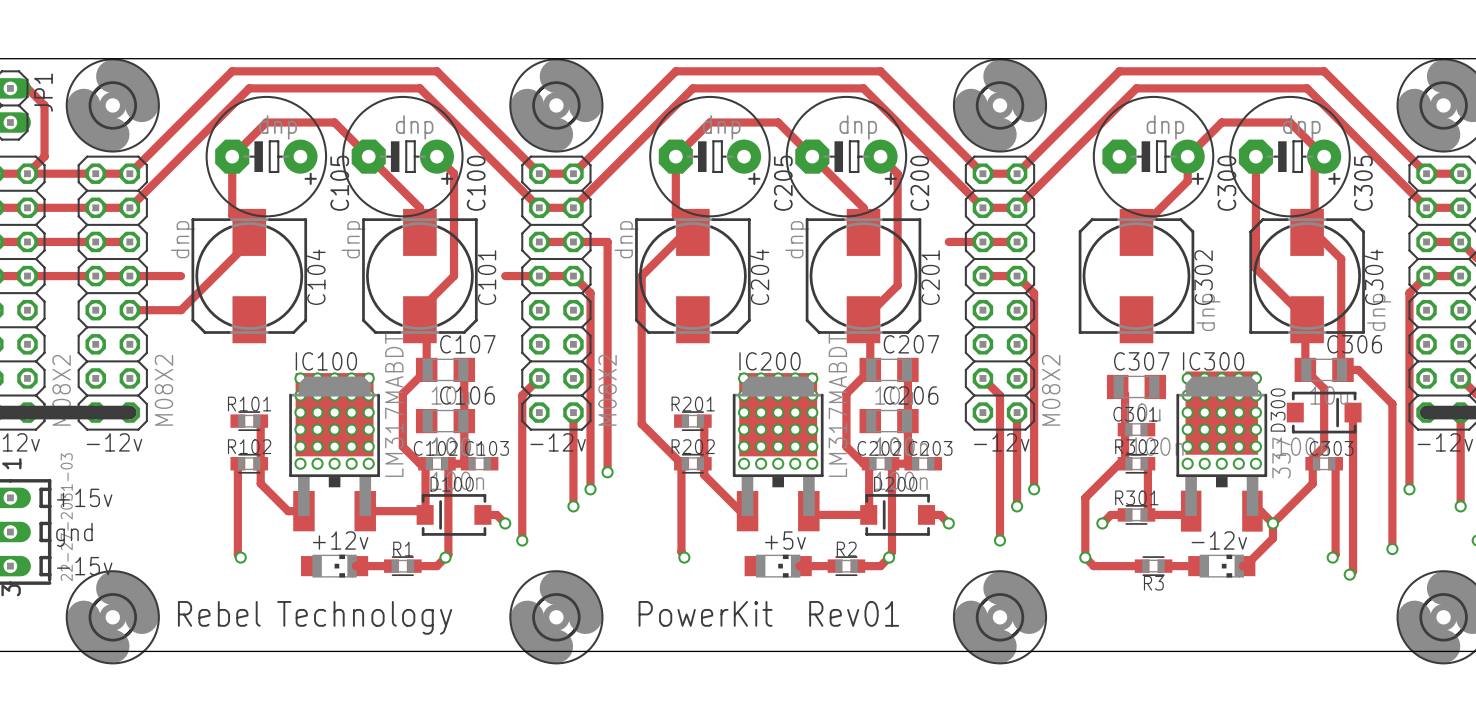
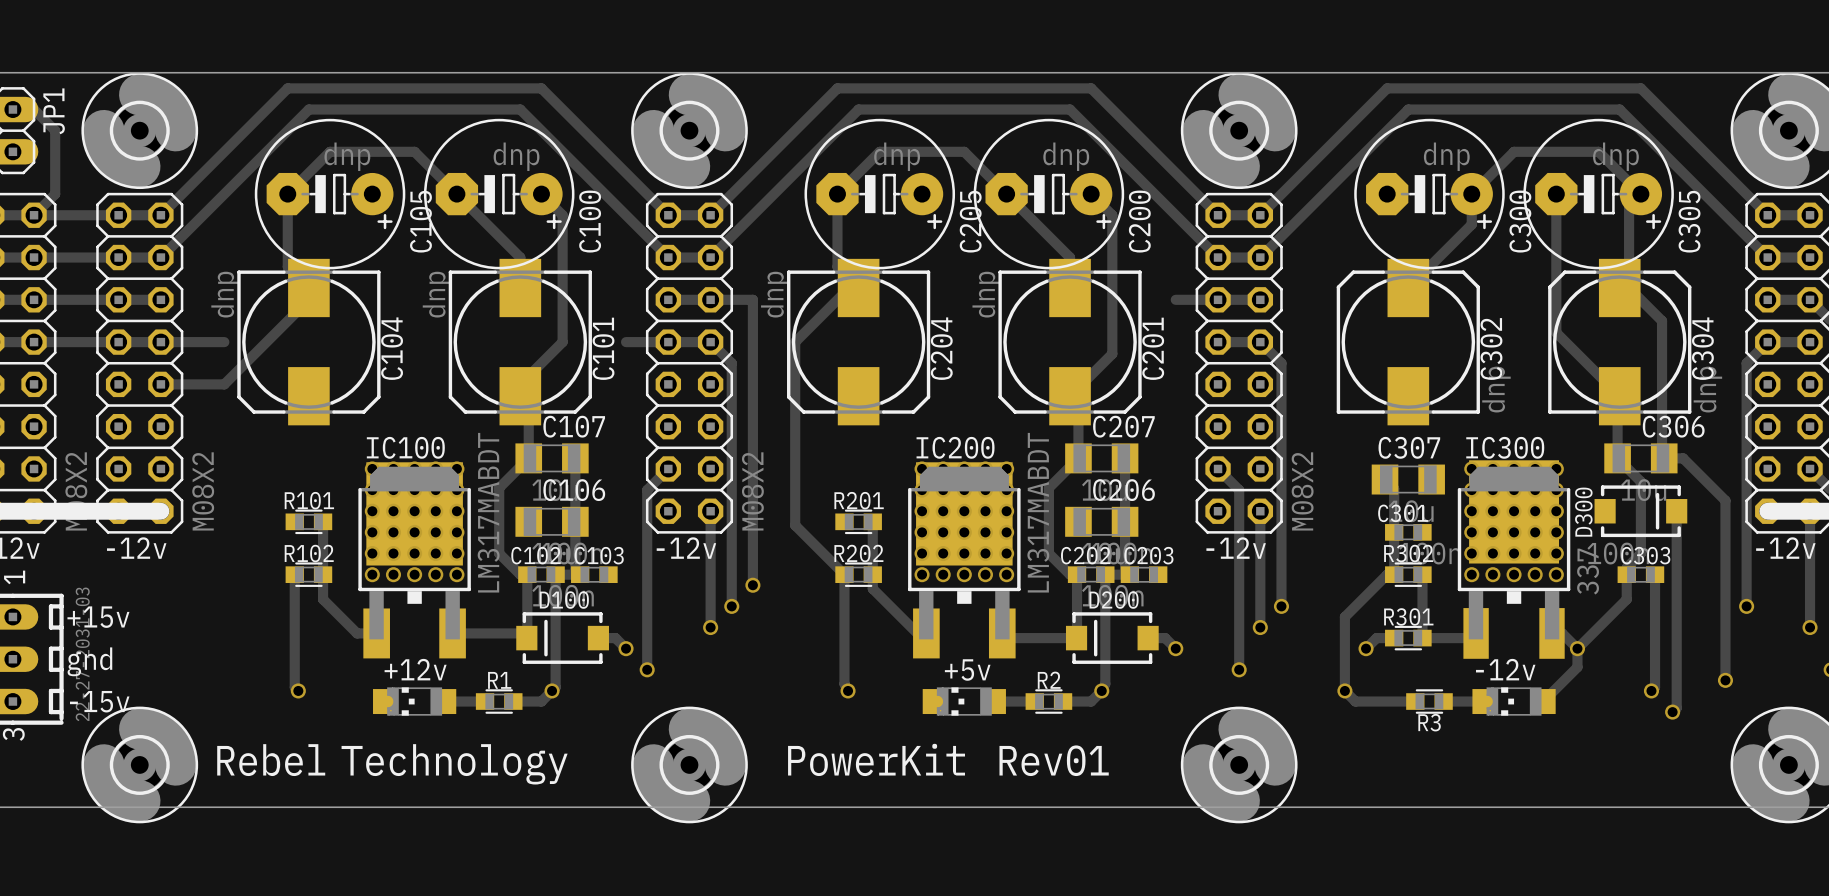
part rotation: 0° (334, 566) -> 180° (414, 701)
part rotation: 0° (778, 566) -> 180° (964, 701)
part rotation: 0° (1221, 566) -> 180° (1514, 701)

